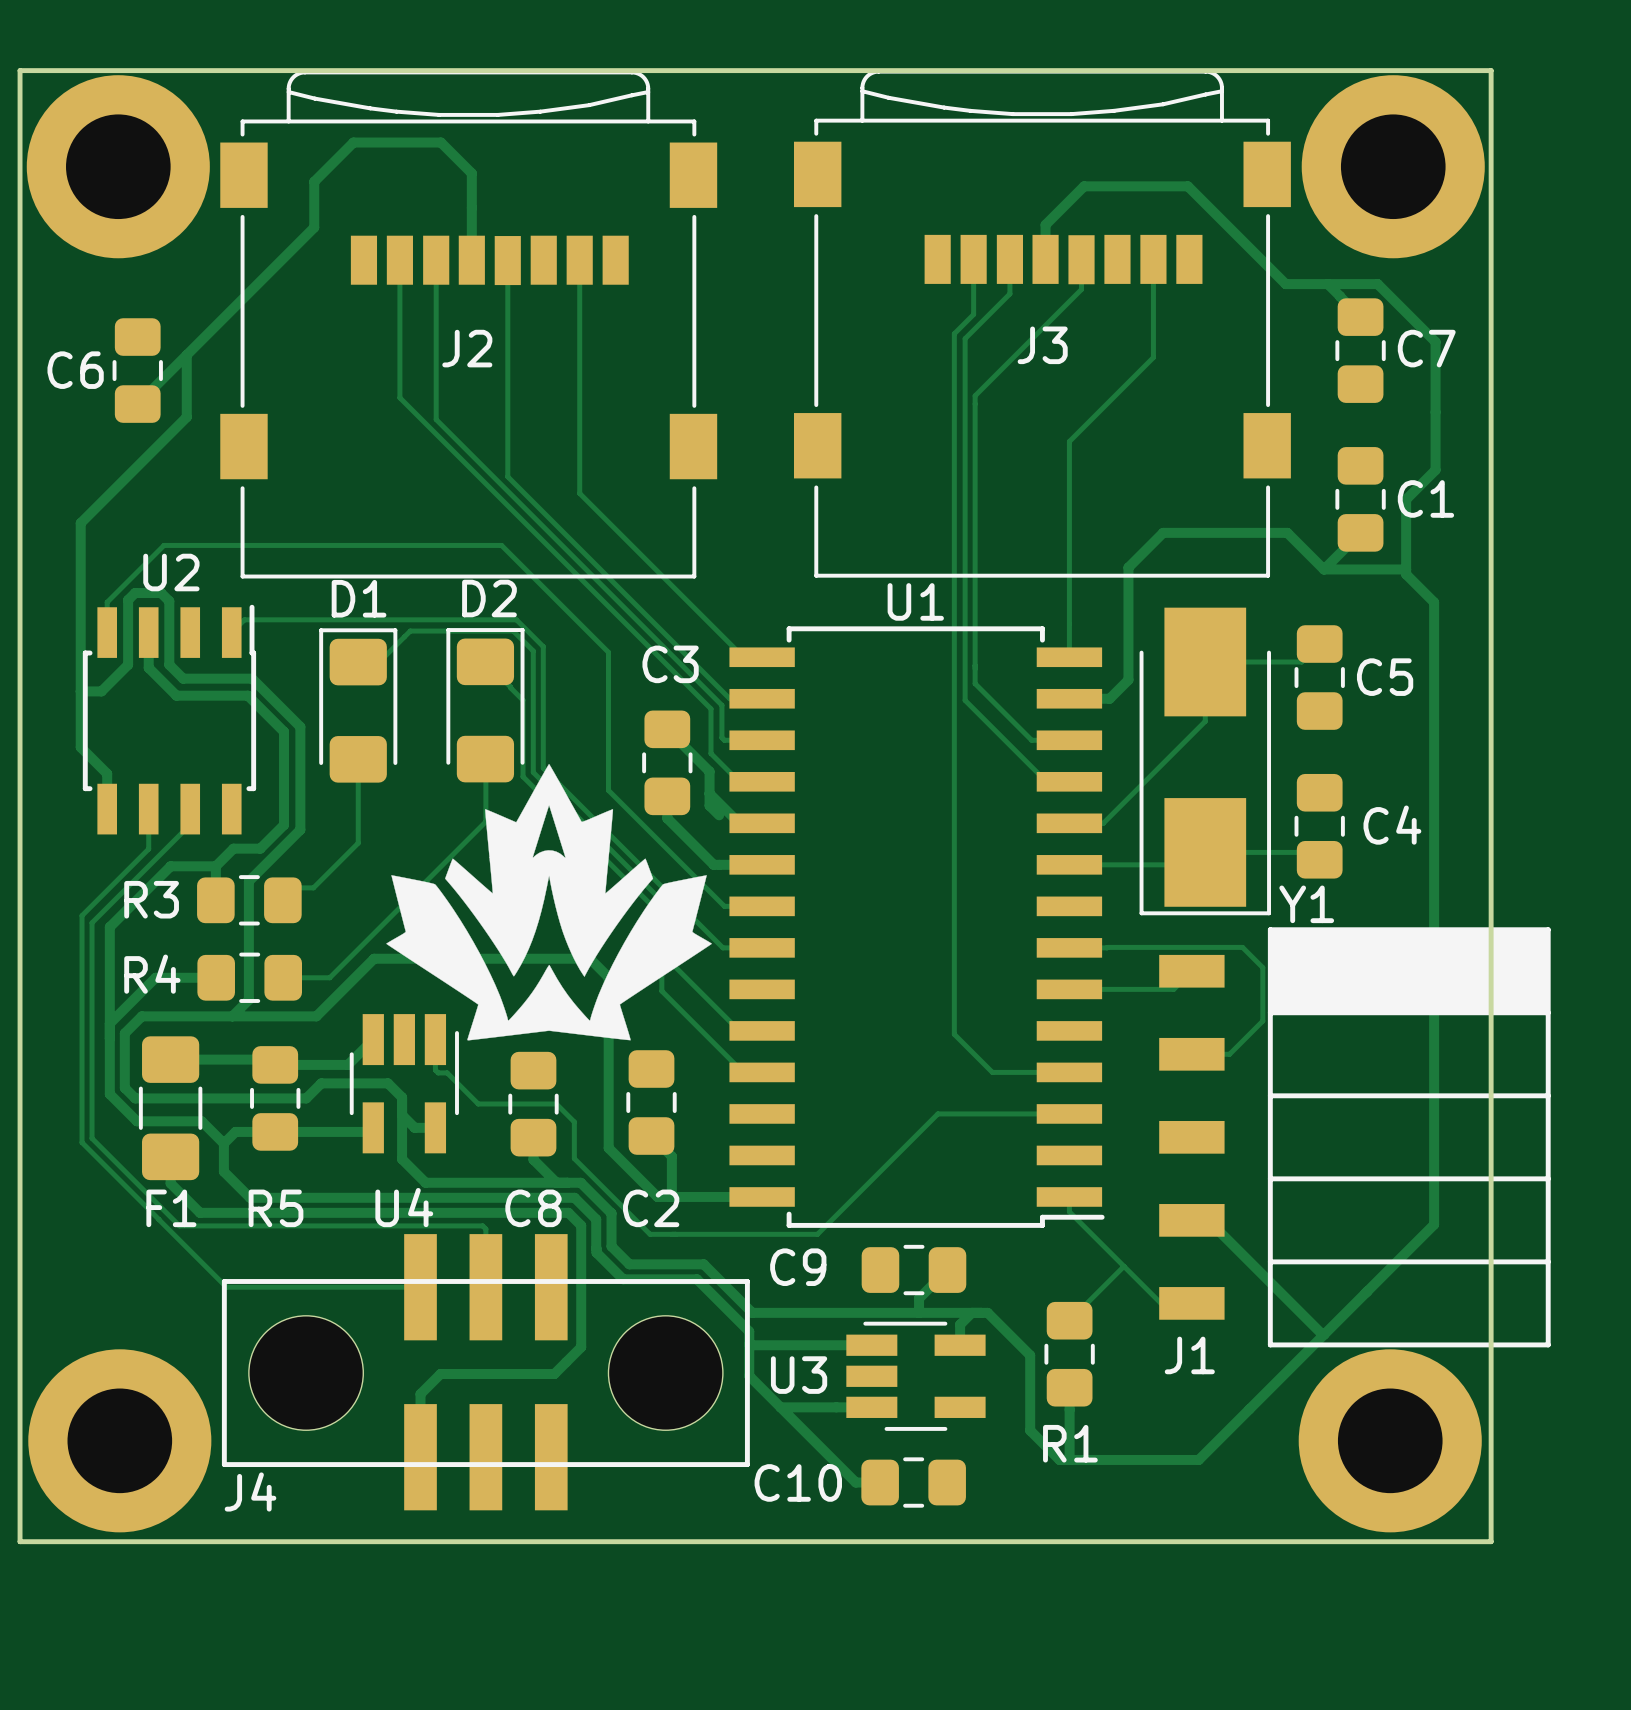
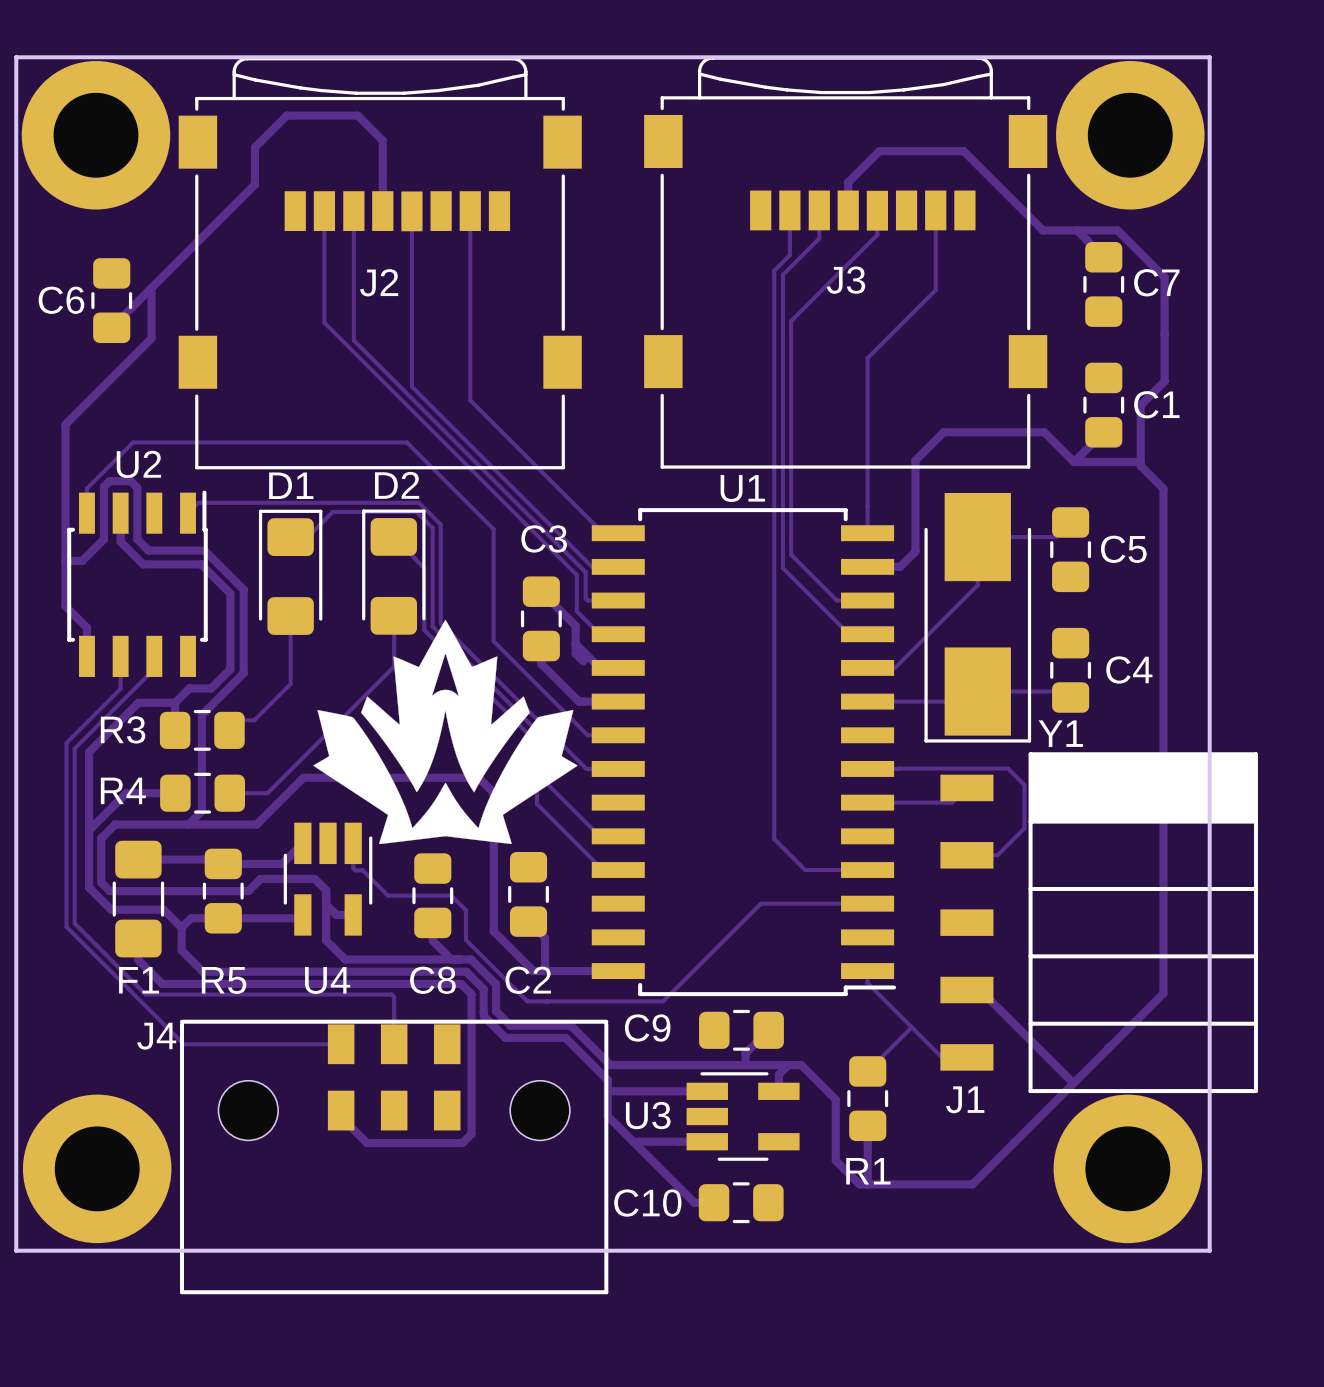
J4 footprint: [221, 1234, 750, 1511] -> [180, 1019, 609, 1295]
track: (581, 1347) (554, 1374) (440, 1374) (420, 1394) (420, 1457) -> (471, 1092) (471, 1134) (462, 1143) (366, 1143) (341, 1117) (341, 1110)
J4 name position: J4 (250, 1491) -> J4 (156, 1036)

